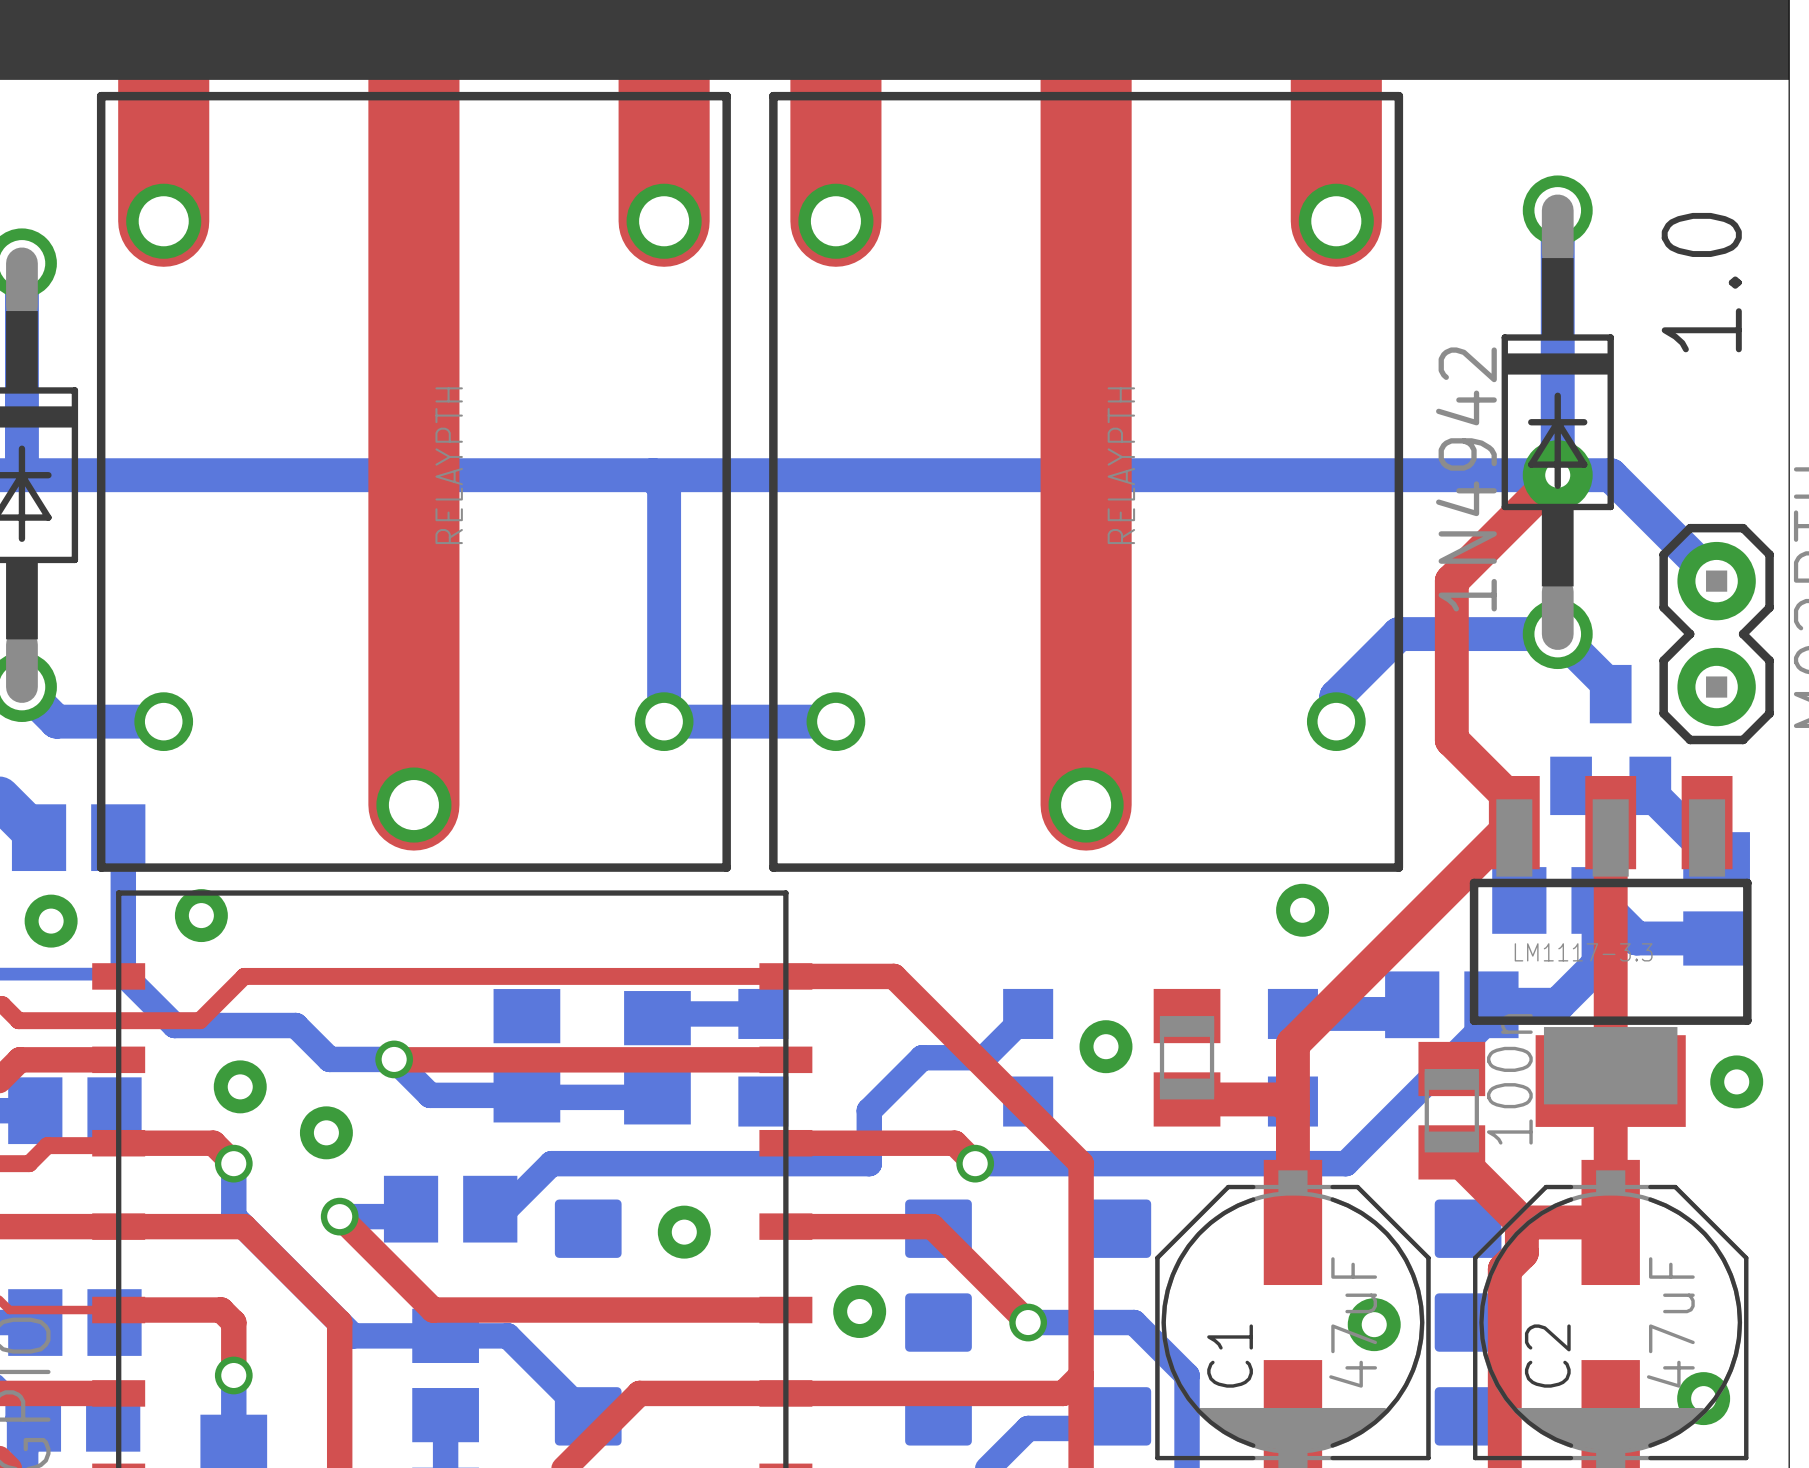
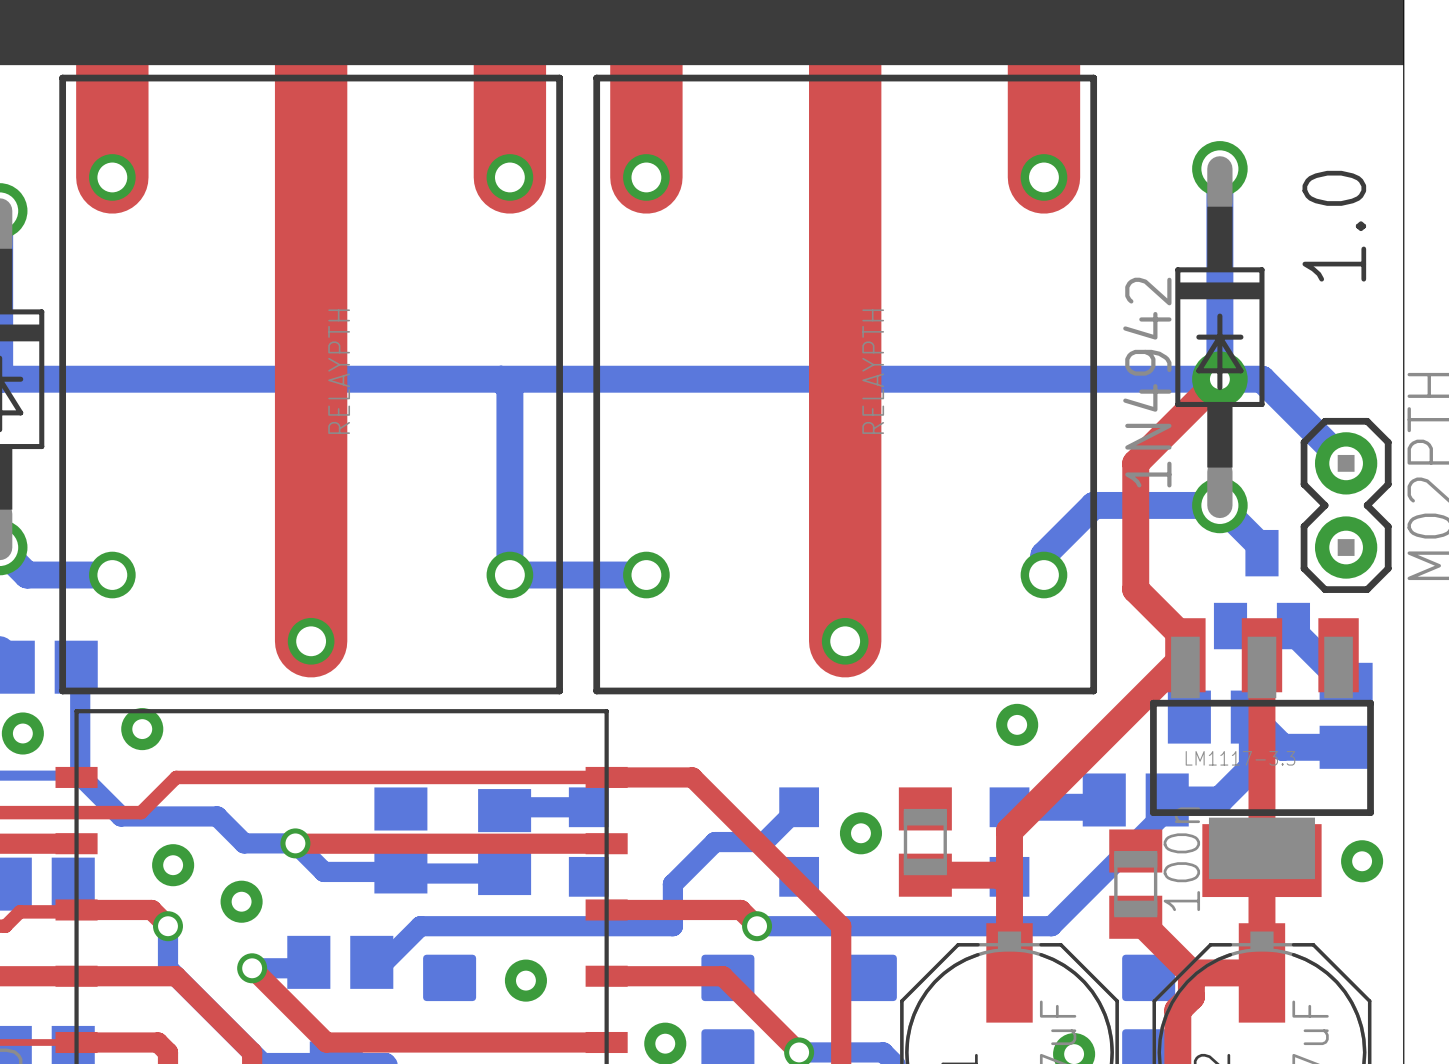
part footprint: [96, 91, 731, 872] -> [59, 74, 563, 695]
part footprint: [769, 91, 1404, 872] -> [593, 74, 1098, 695]

